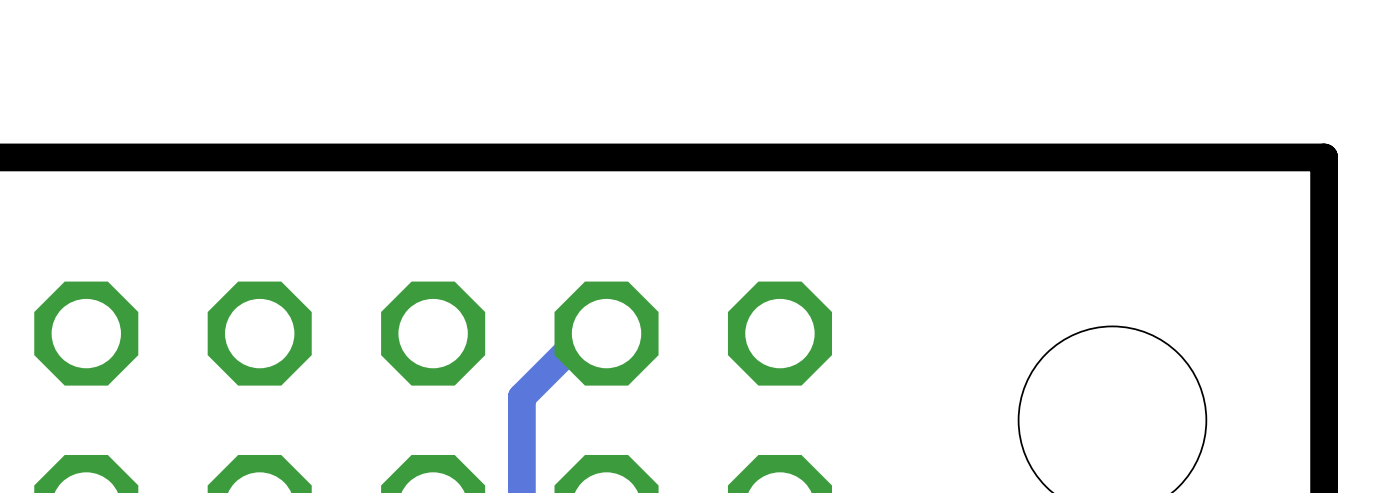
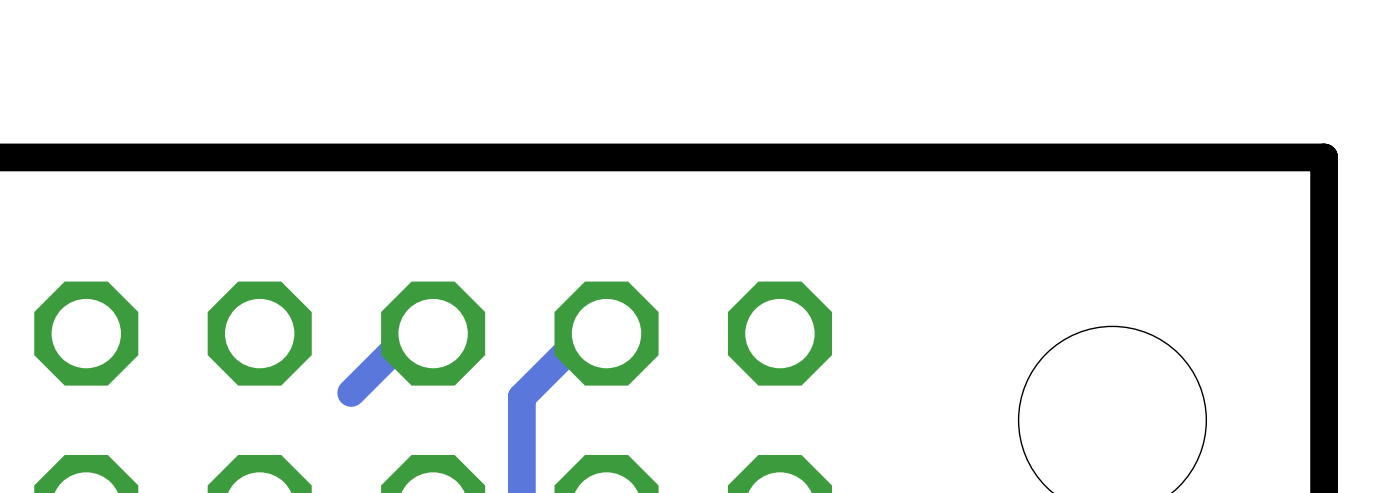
bottom track: none -> (433, 333) (410, 333) (351, 392)

